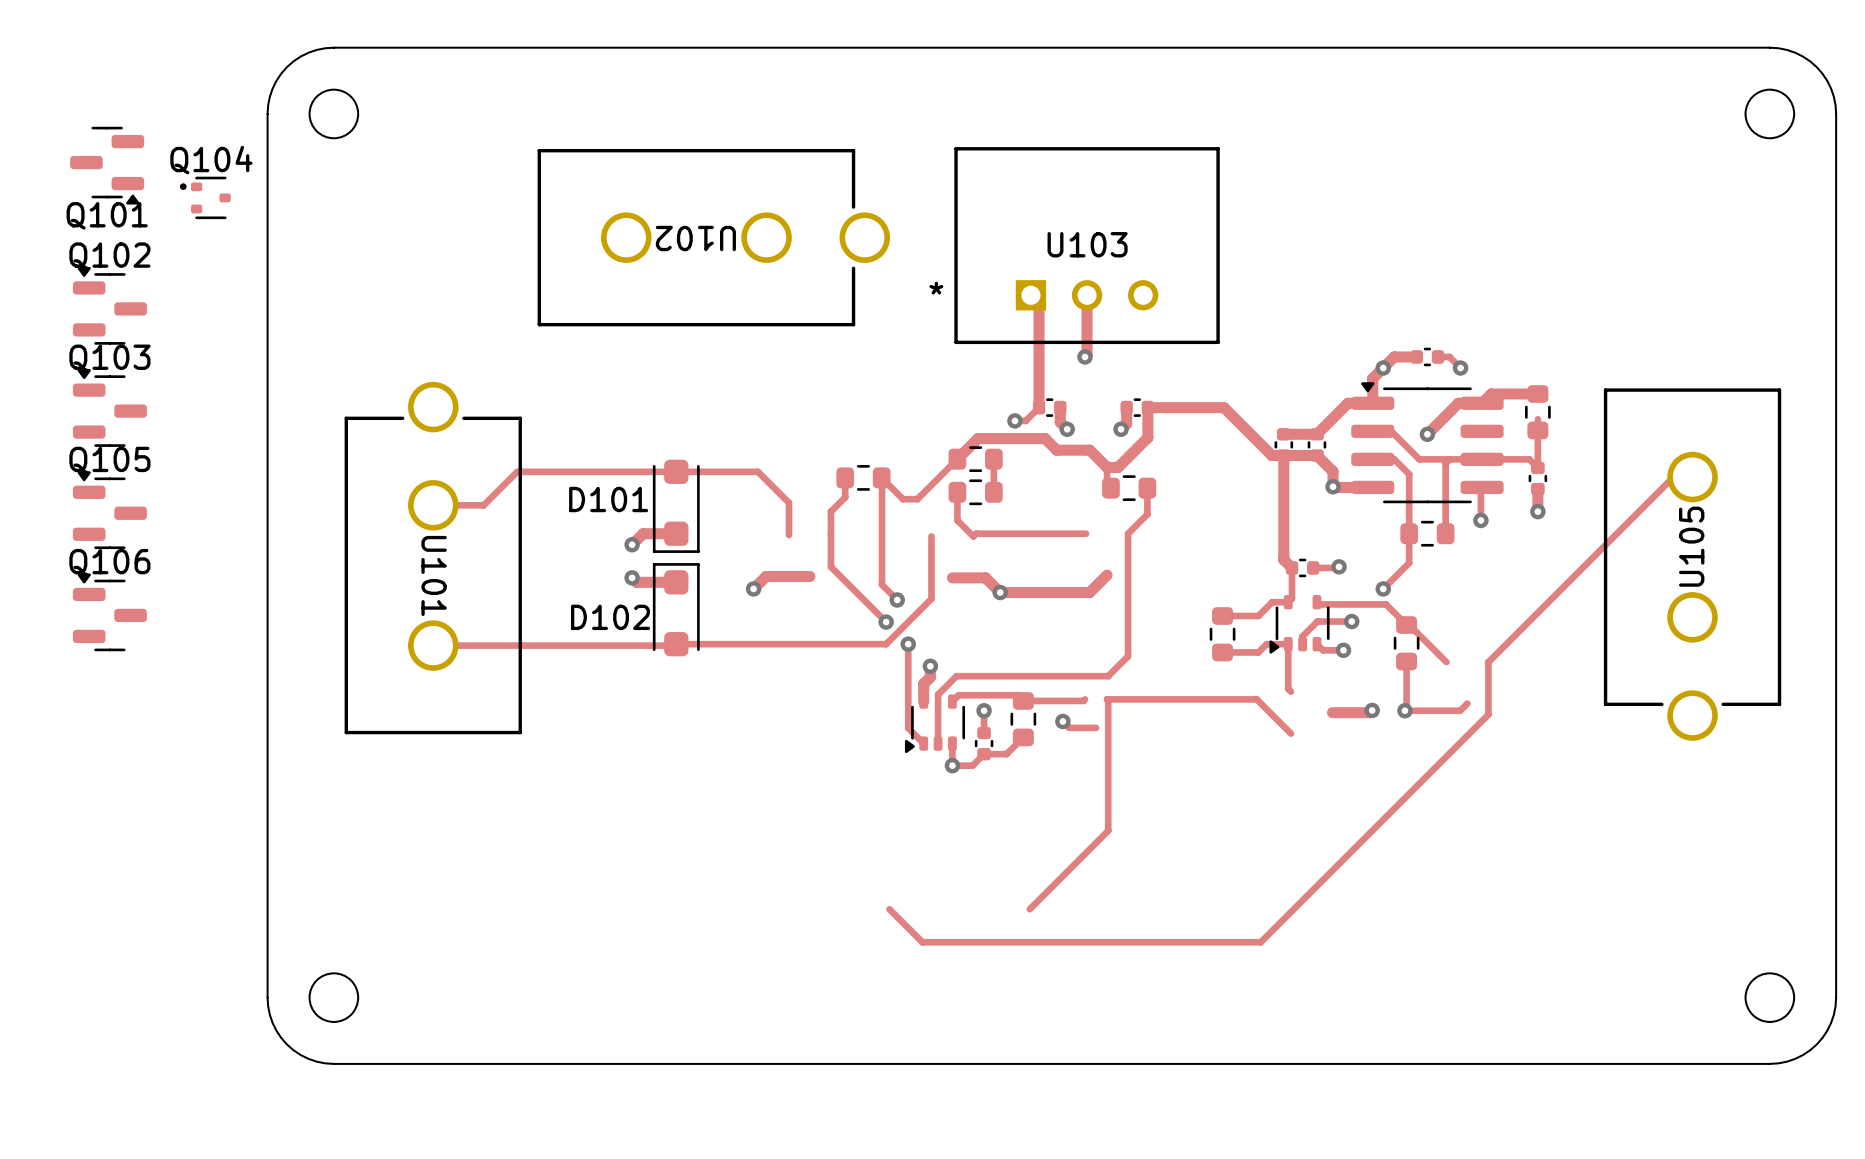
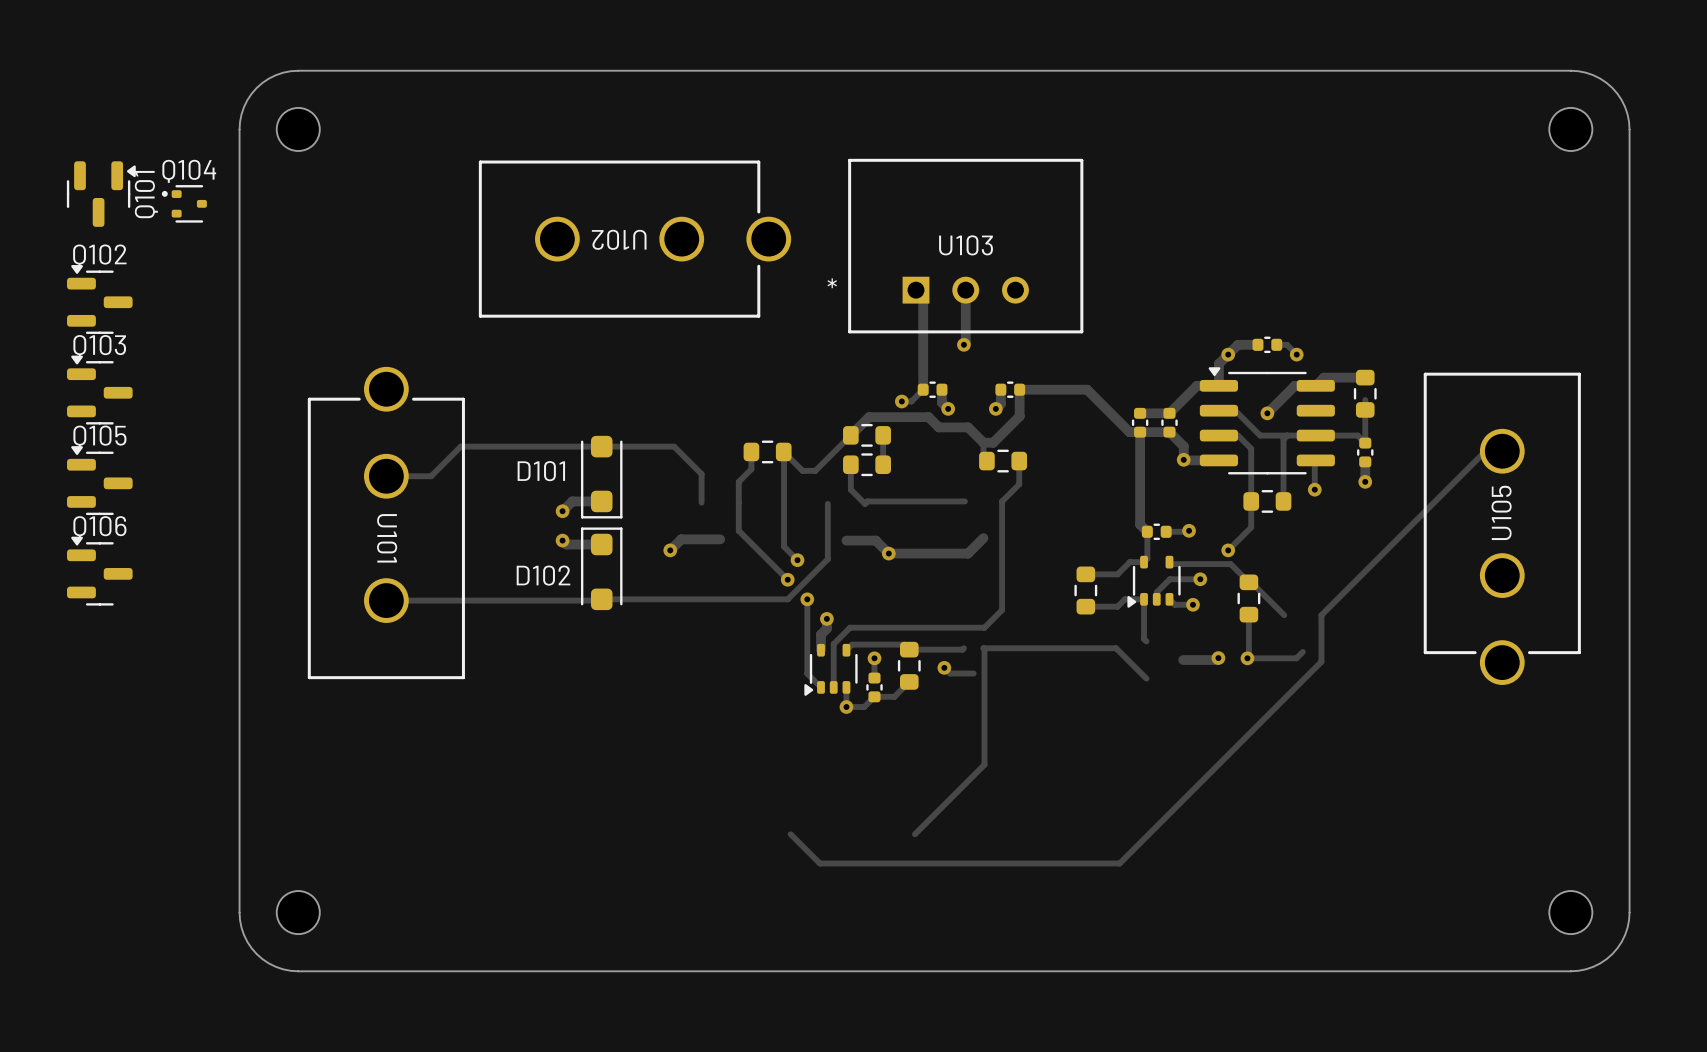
Q101 rotation: 0° (107, 165) -> 90° counterclockwise (101, 194)

